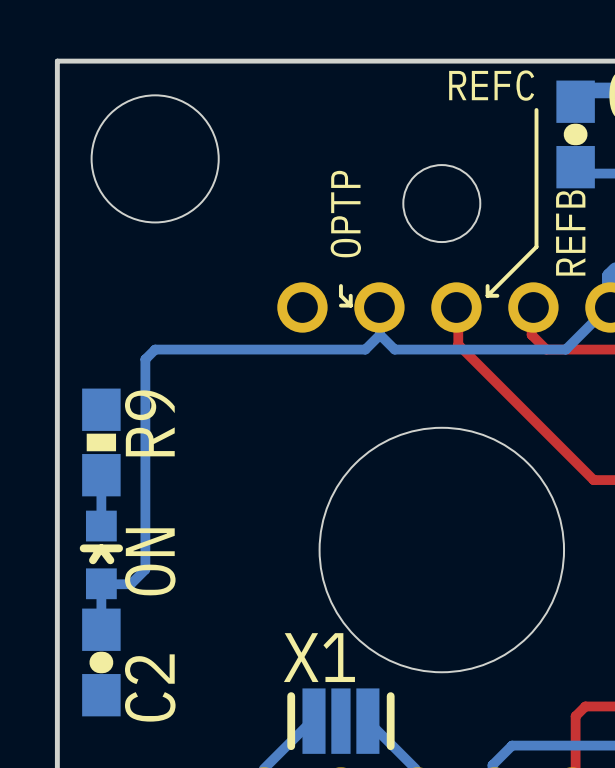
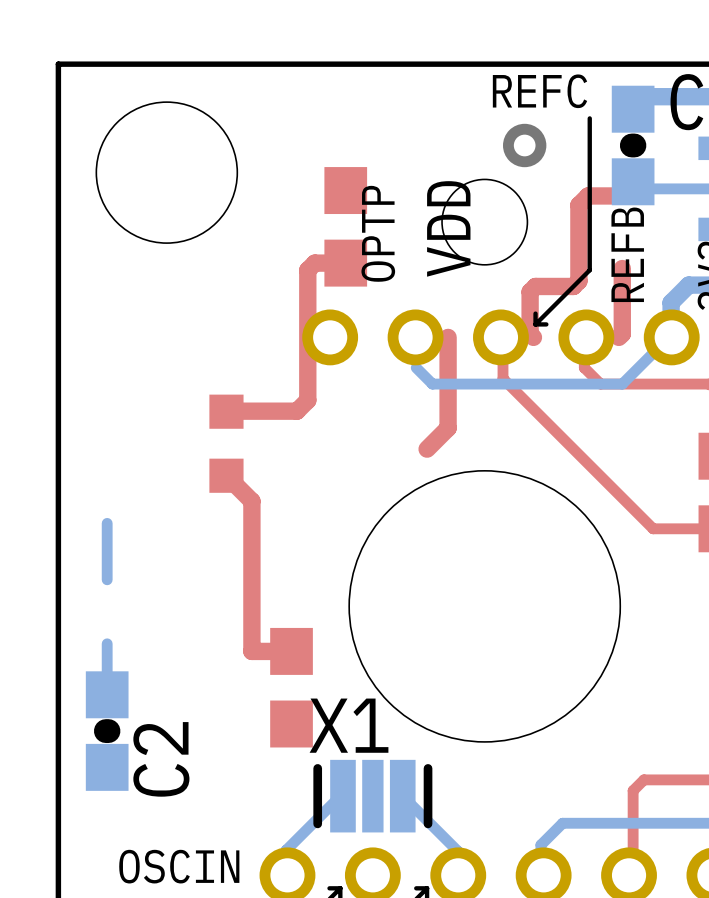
via: none -> (524, 145)
top track: none -> (622, 195) (588, 195) (578, 205) (578, 281) (573, 286) (535, 286) (530, 291) (530, 334) (533, 337)
text: none -> VDD (448, 228)
top track: none -> (345, 263) (314, 263) (307, 270) (307, 400) (296, 411) (226, 411)
top track: none -> (622, 268) (622, 333) (618, 337)
line: (340, 286) (340, 295) (350, 305) -> none
line: (350, 295) (350, 305) -> none
line: (350, 305) (340, 305) -> none
bottom track: (379, 307) (380, 334) (365, 349) (155, 349) (145, 359) (145, 569) (130, 584) (101, 584) -> none
top track: none -> (448, 337) (448, 428) (427, 449)
top track: none -> (226, 475) (251, 501) (251, 651) (291, 651)
R9 side: bottom (101, 442) -> top (345, 226)
ON side: bottom (101, 554) -> top (226, 443)
part: none -> (291, 687)

